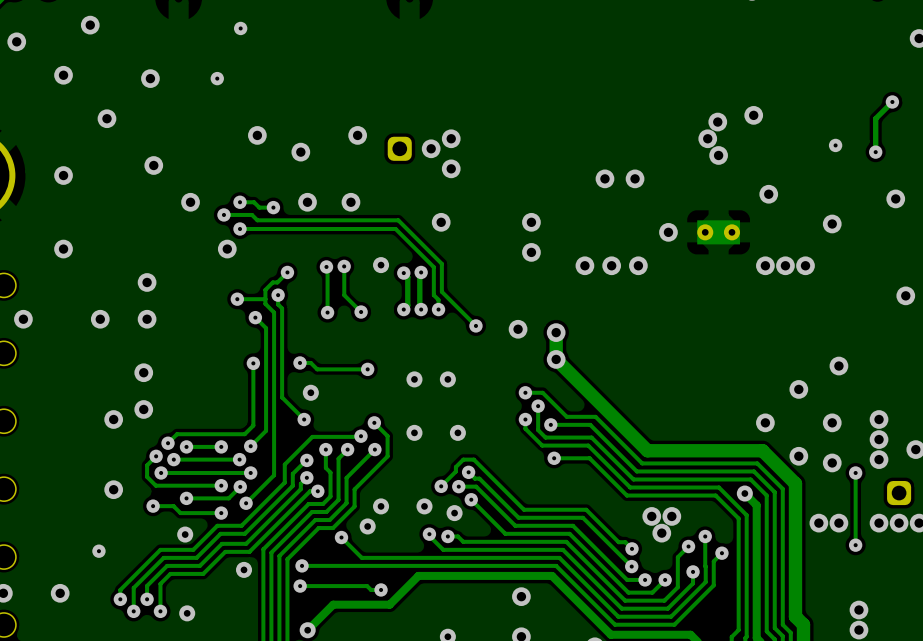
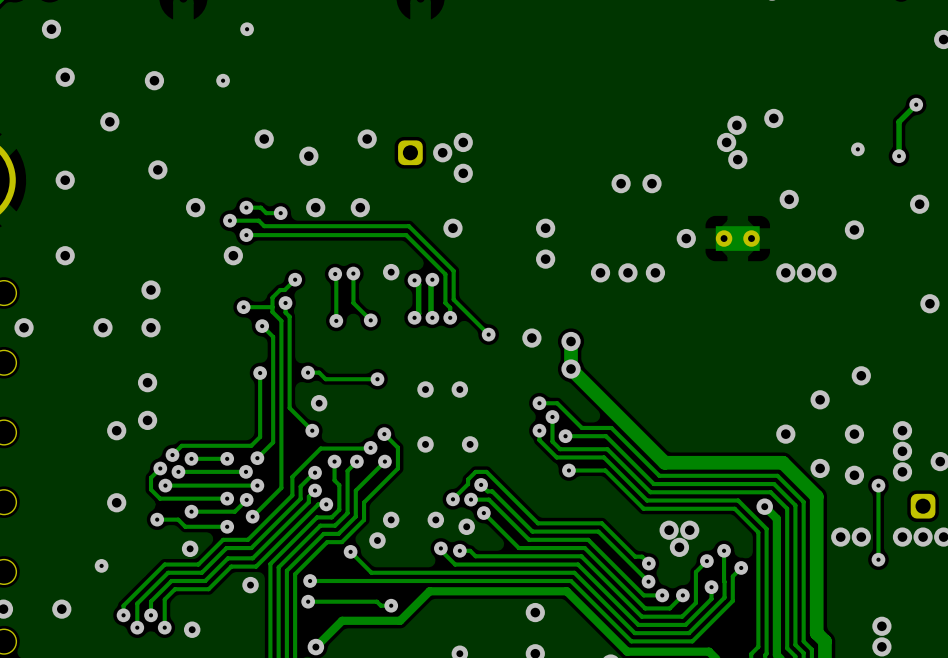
via: (90, 25) -> none
via: none -> (51, 29)
via: (16, 41) -> none

